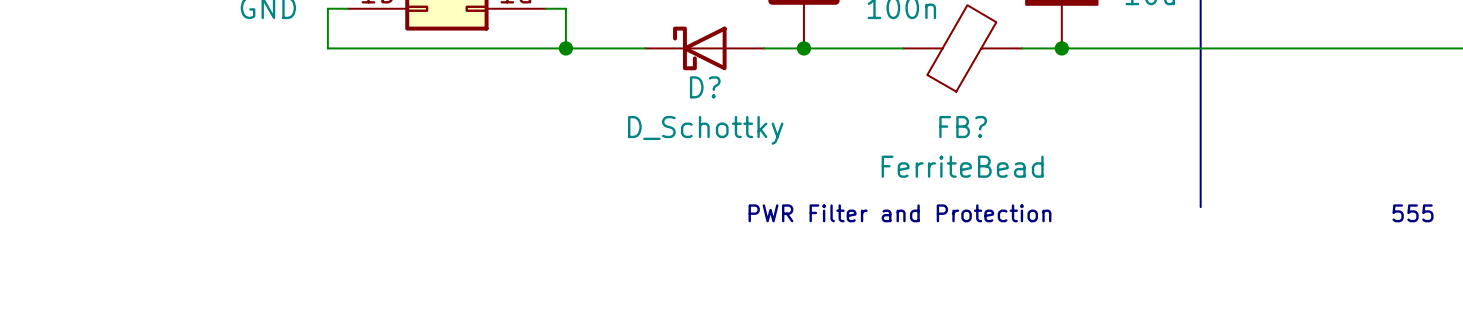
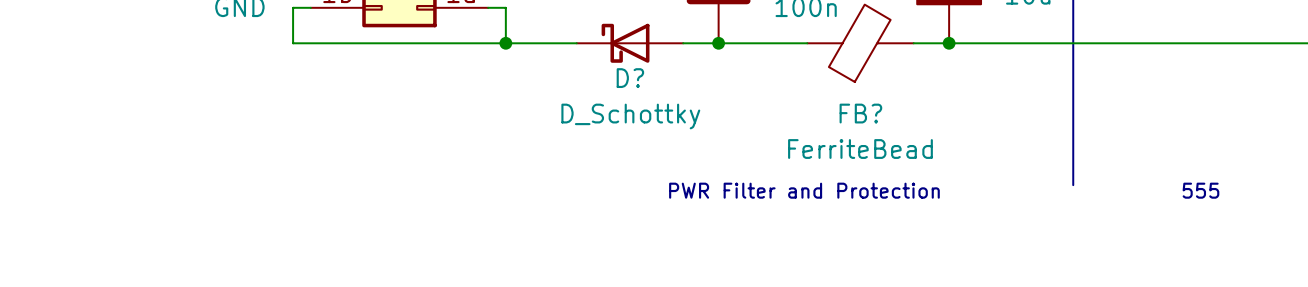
text position: 555 (1413, 213) -> 555 (1200, 190)

